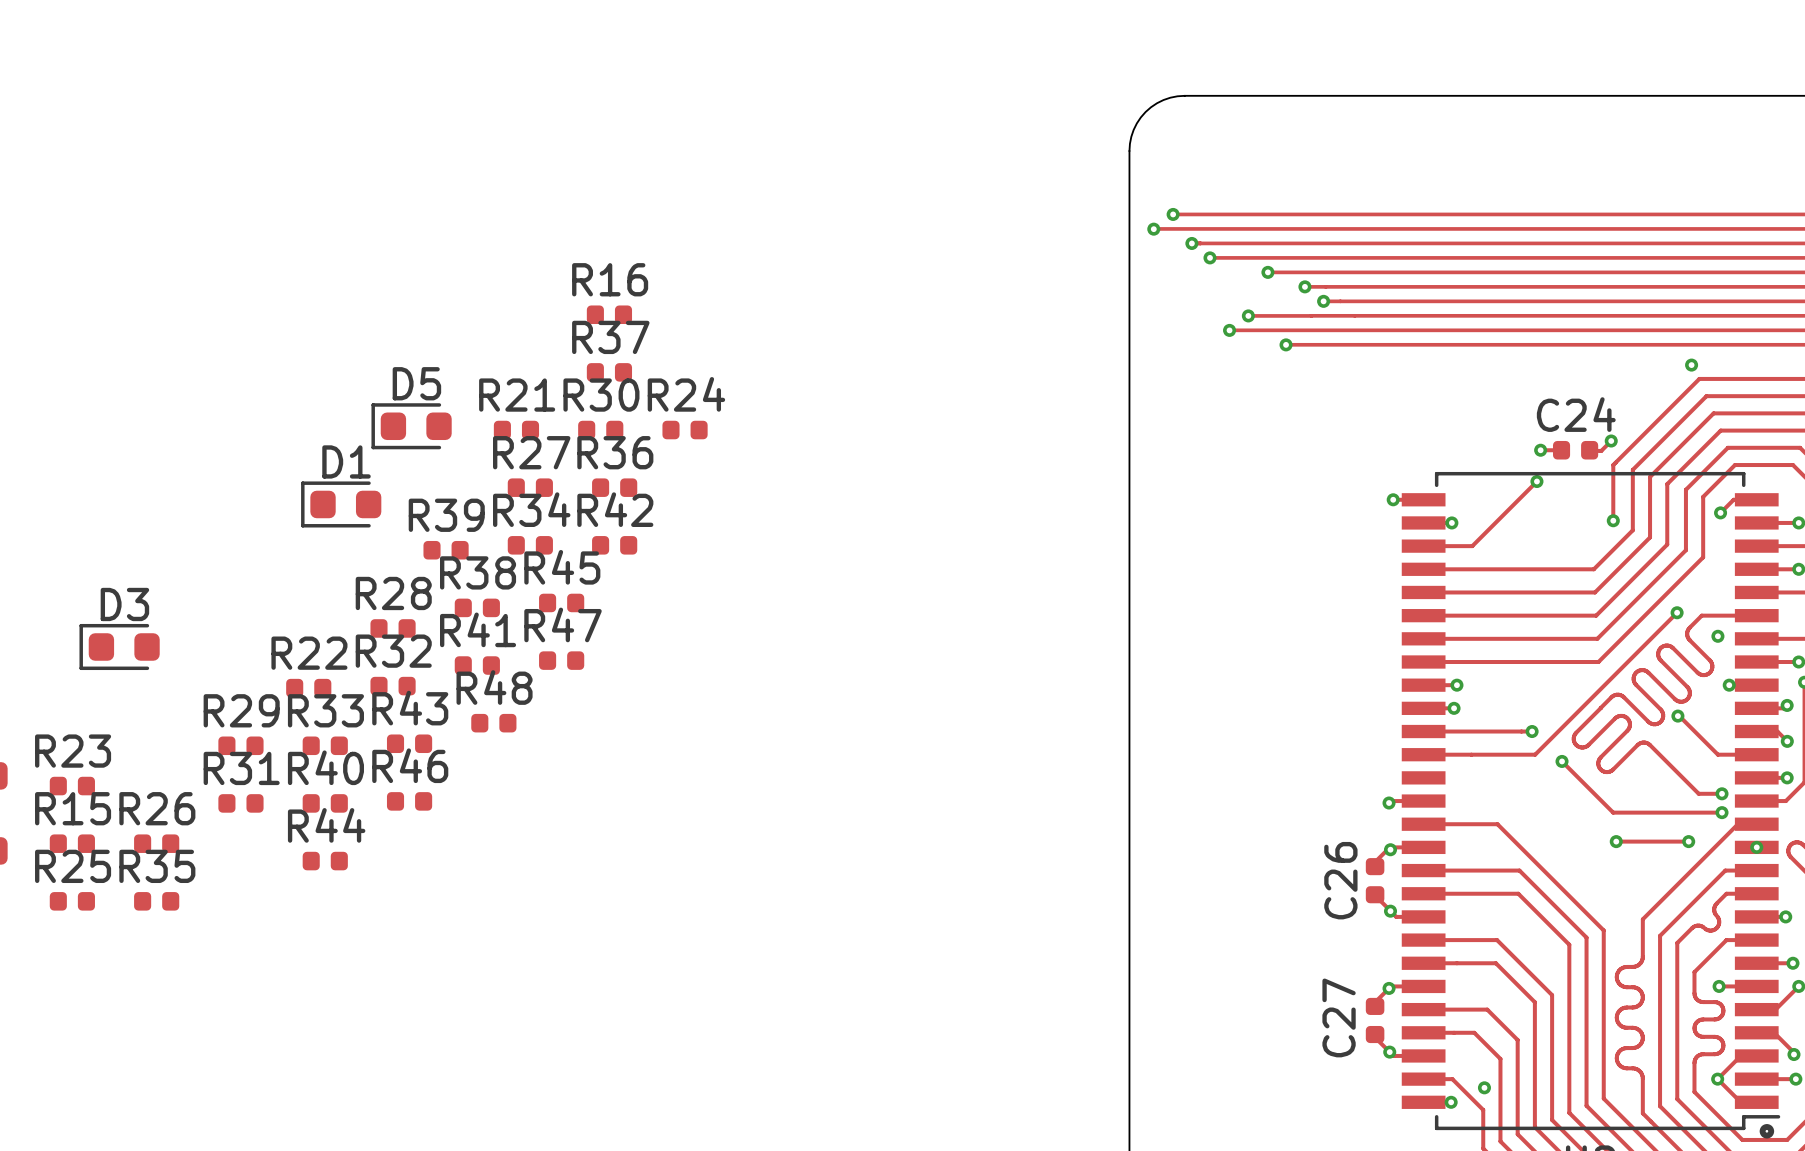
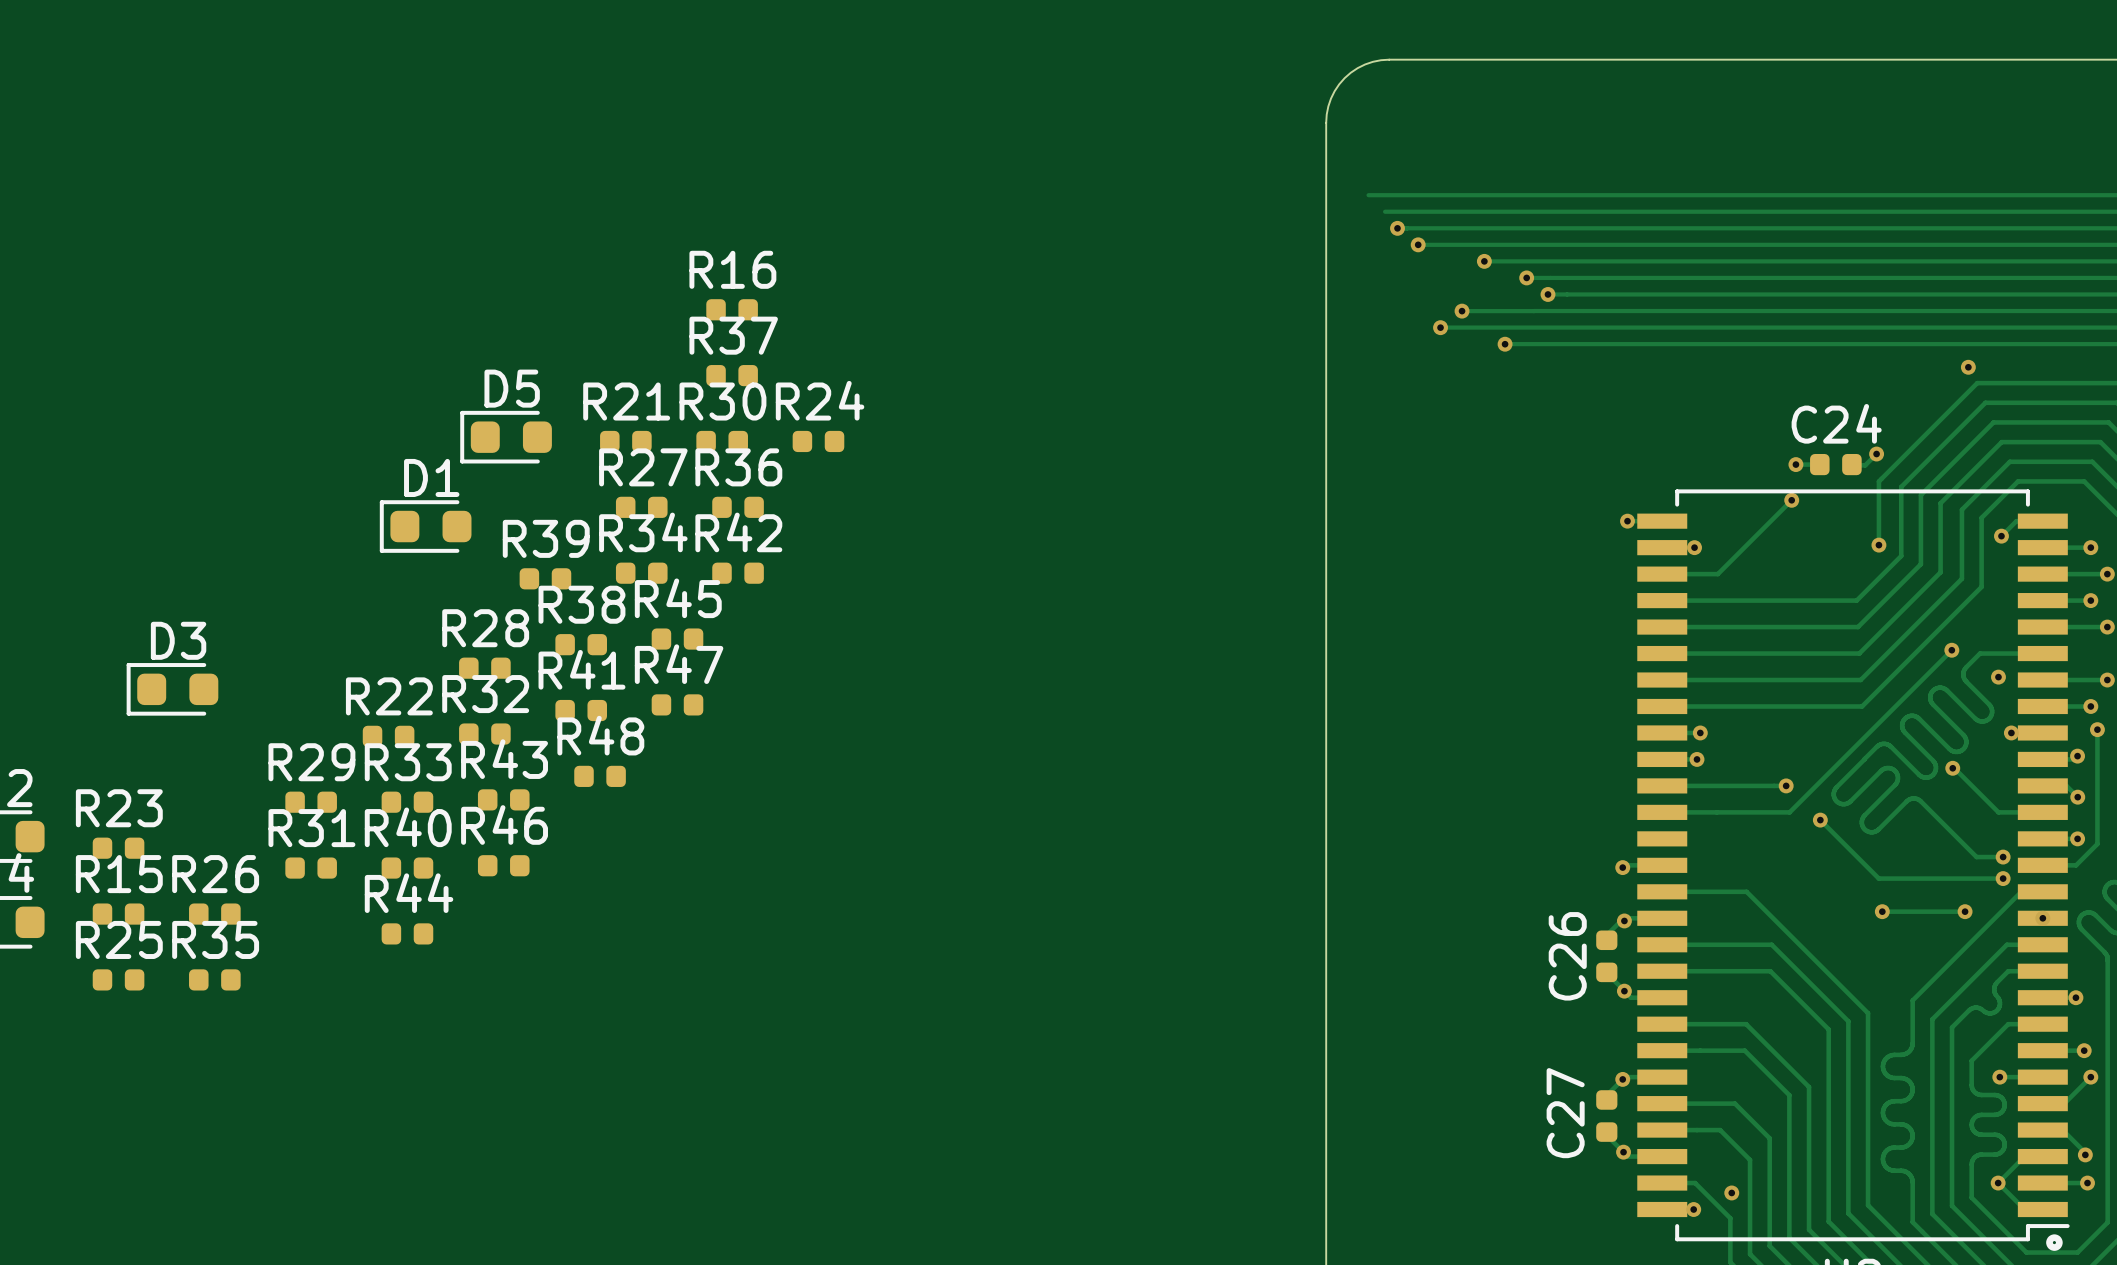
track: none -> (1368, 195) (1376, 195)
via: (1173, 214) -> none
track: (1154, 228) (1181, 228) -> none
via: (1153, 229) -> none

